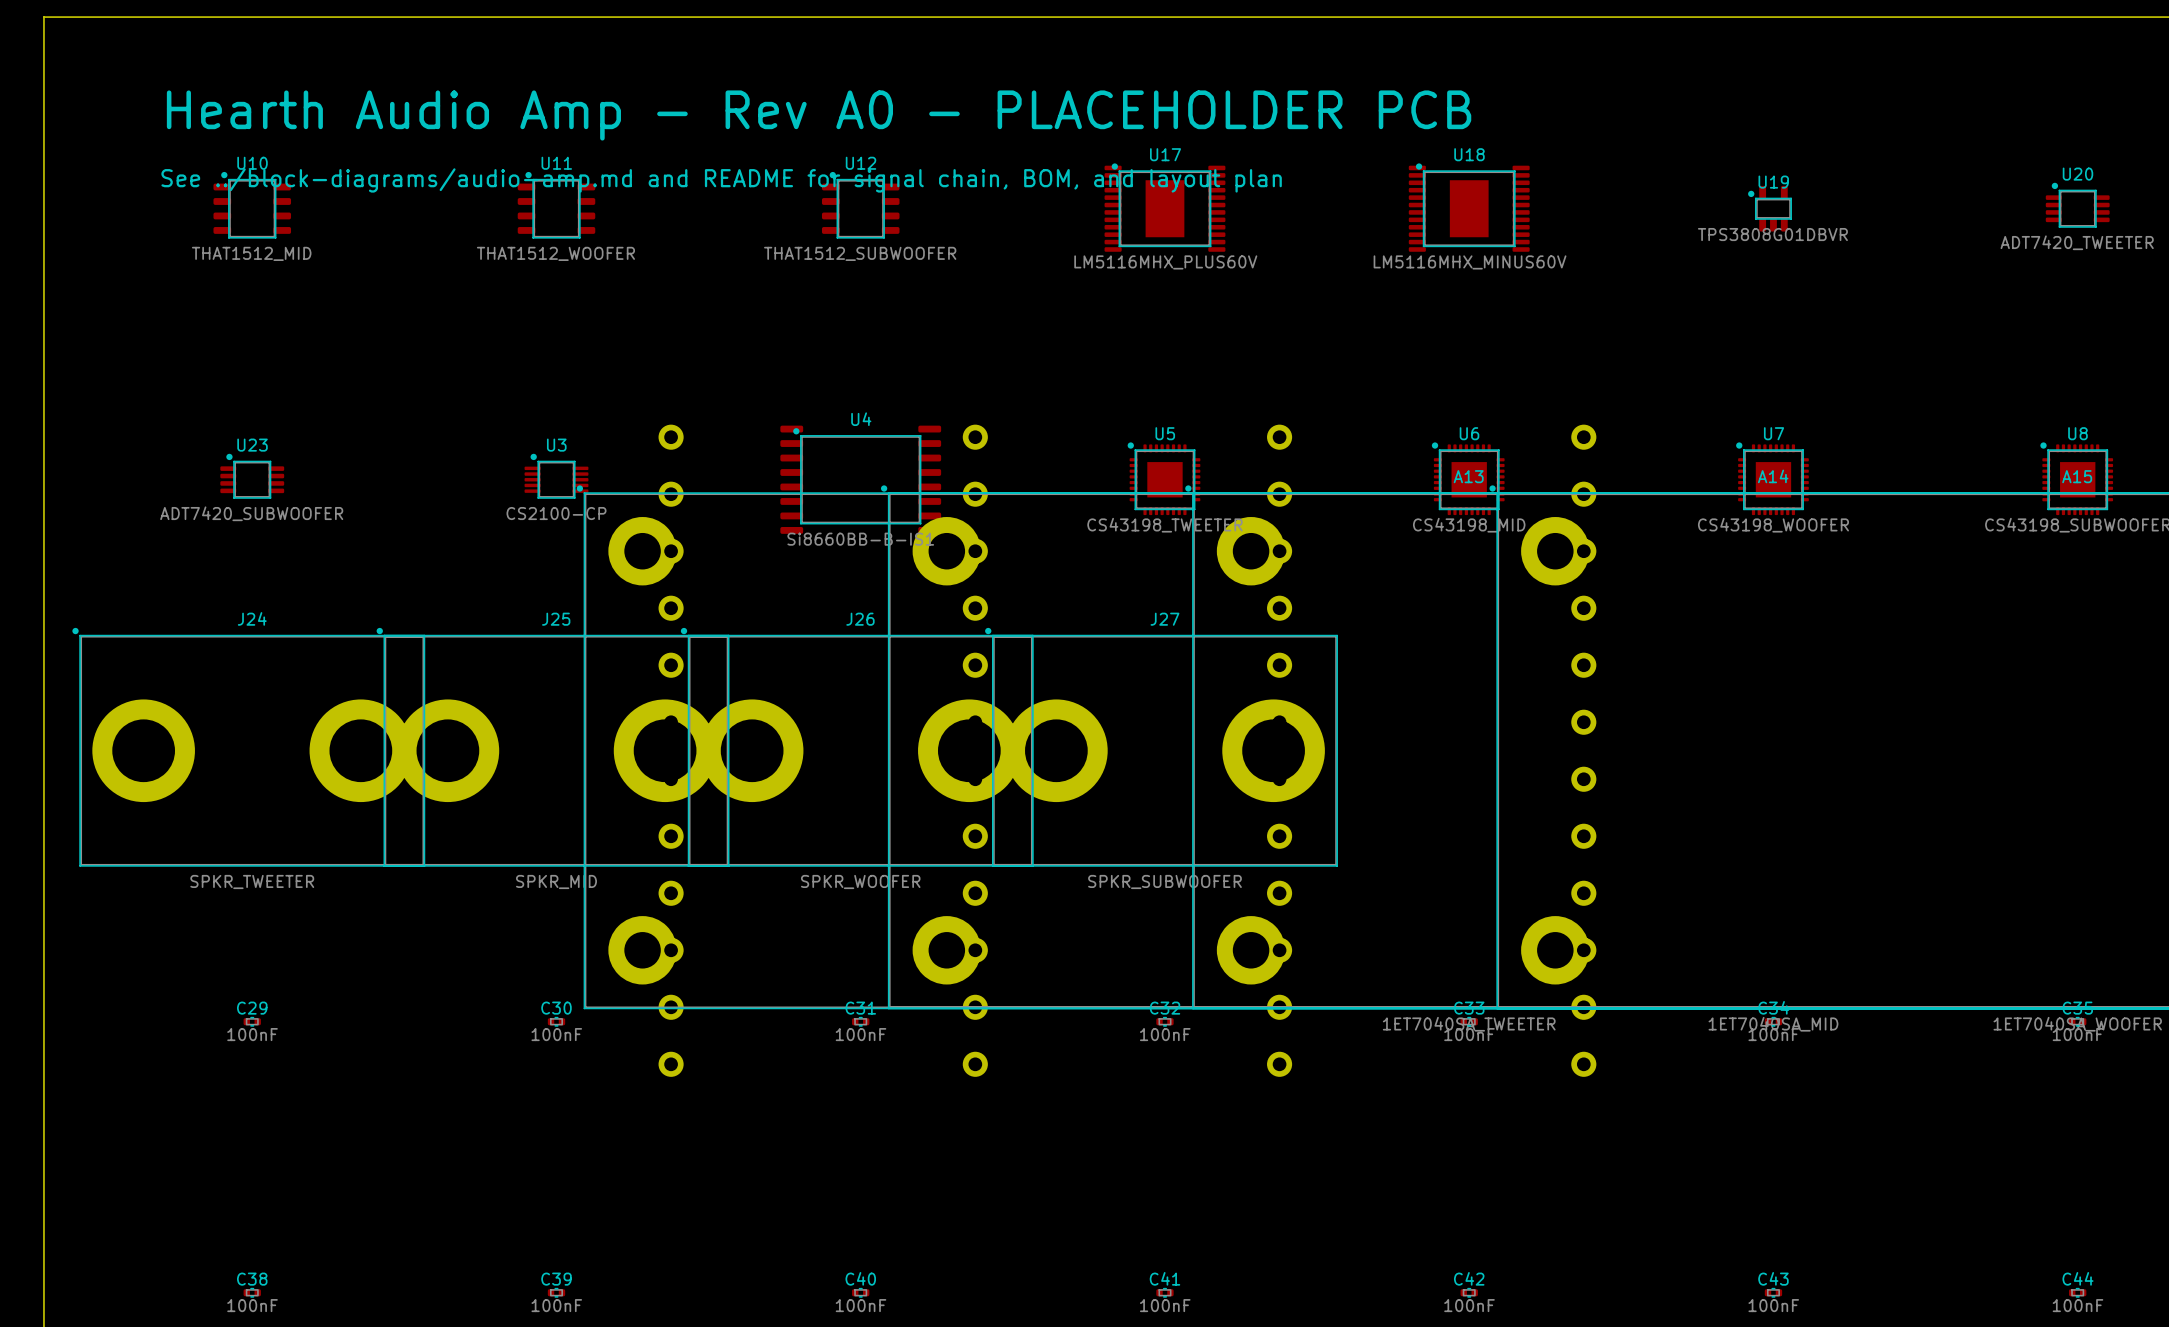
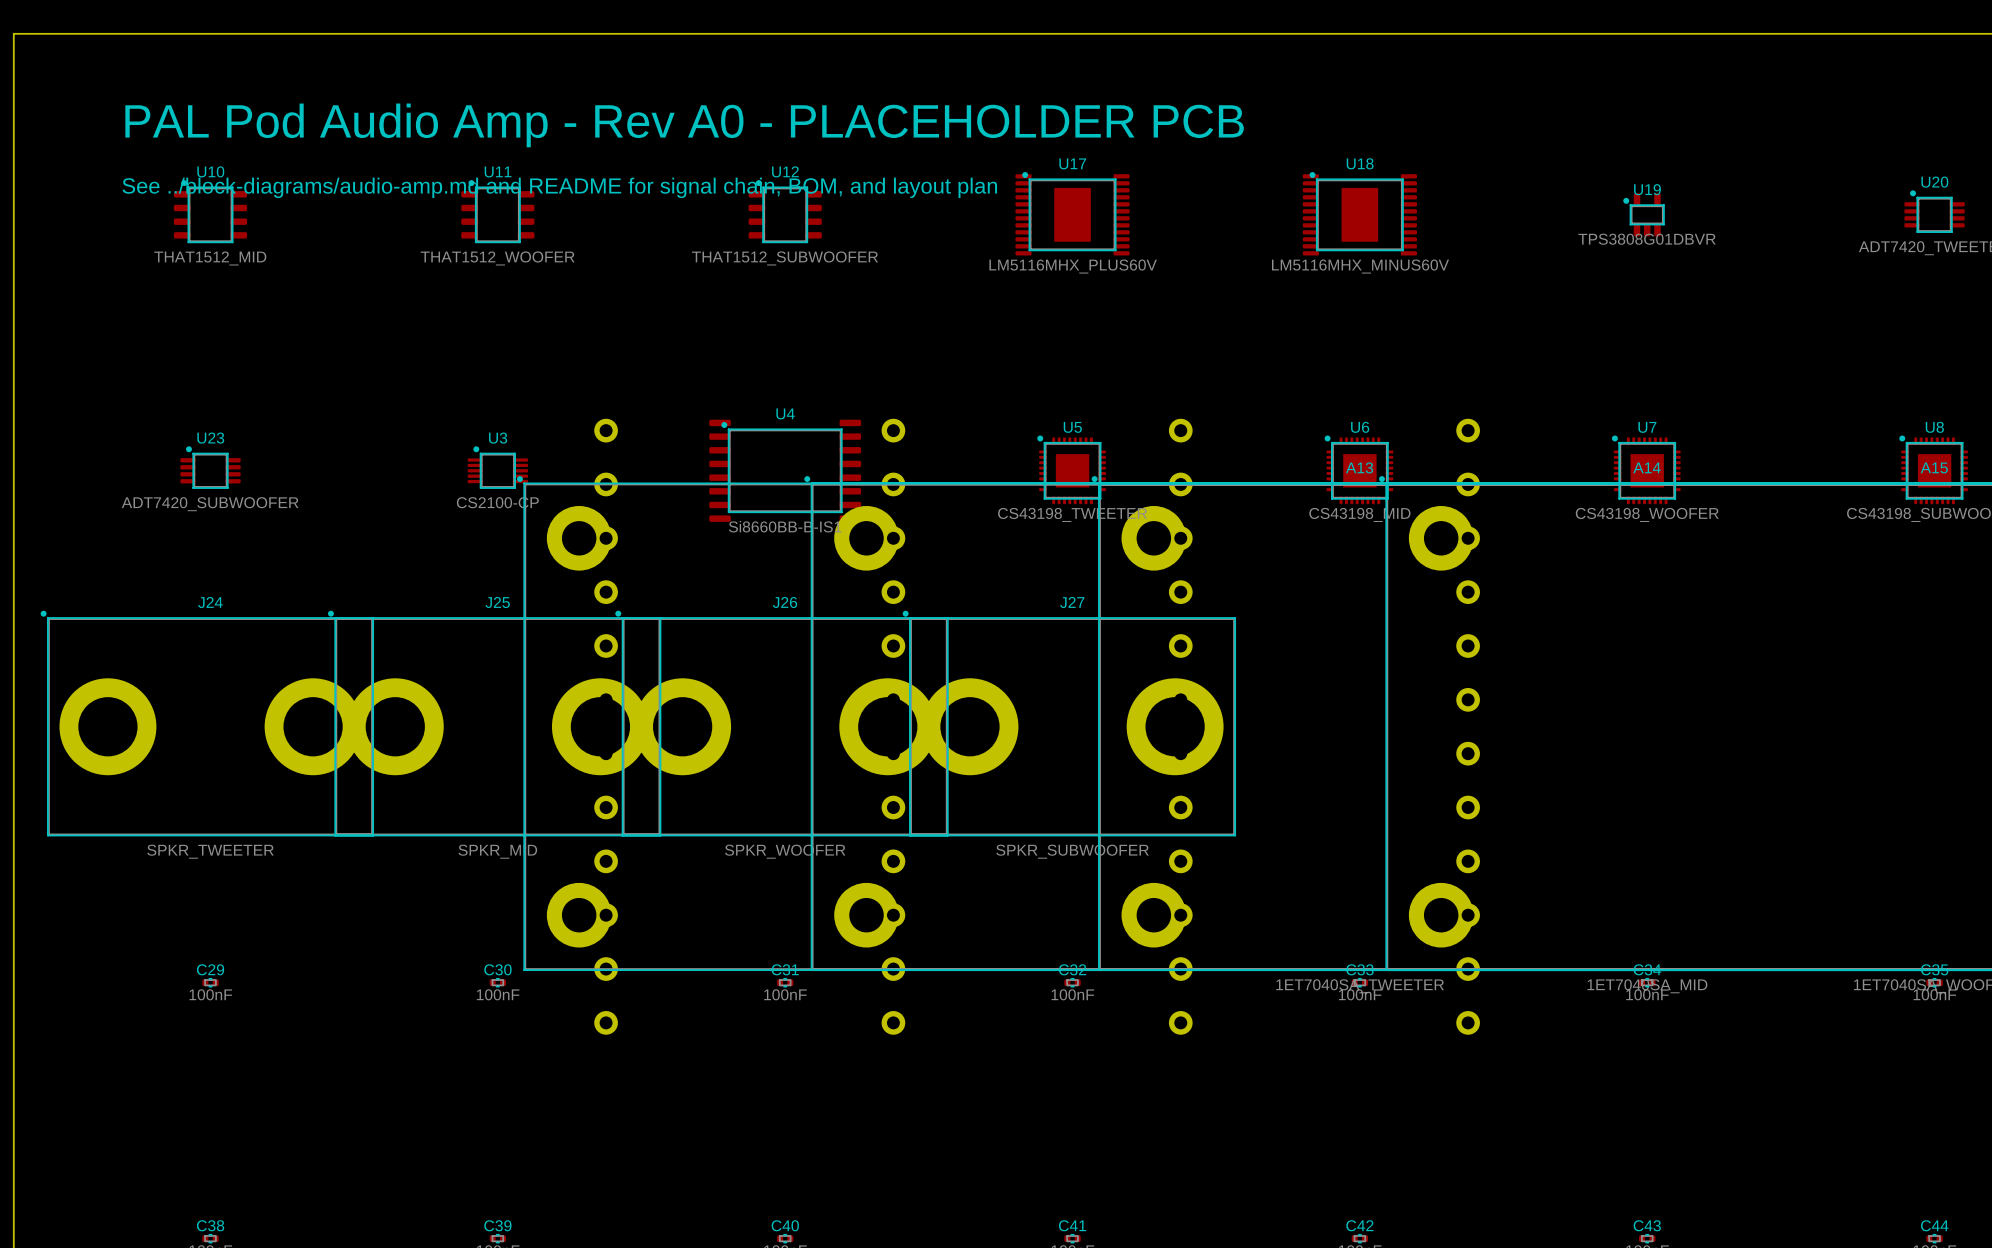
text: Hearth Audio Amp - Rev A0 - PLACEHOLDER PCB (819, 115) -> PAL Pod Audio Amp - Rev A0 - PLACEHOLDER PCB (684, 125)

